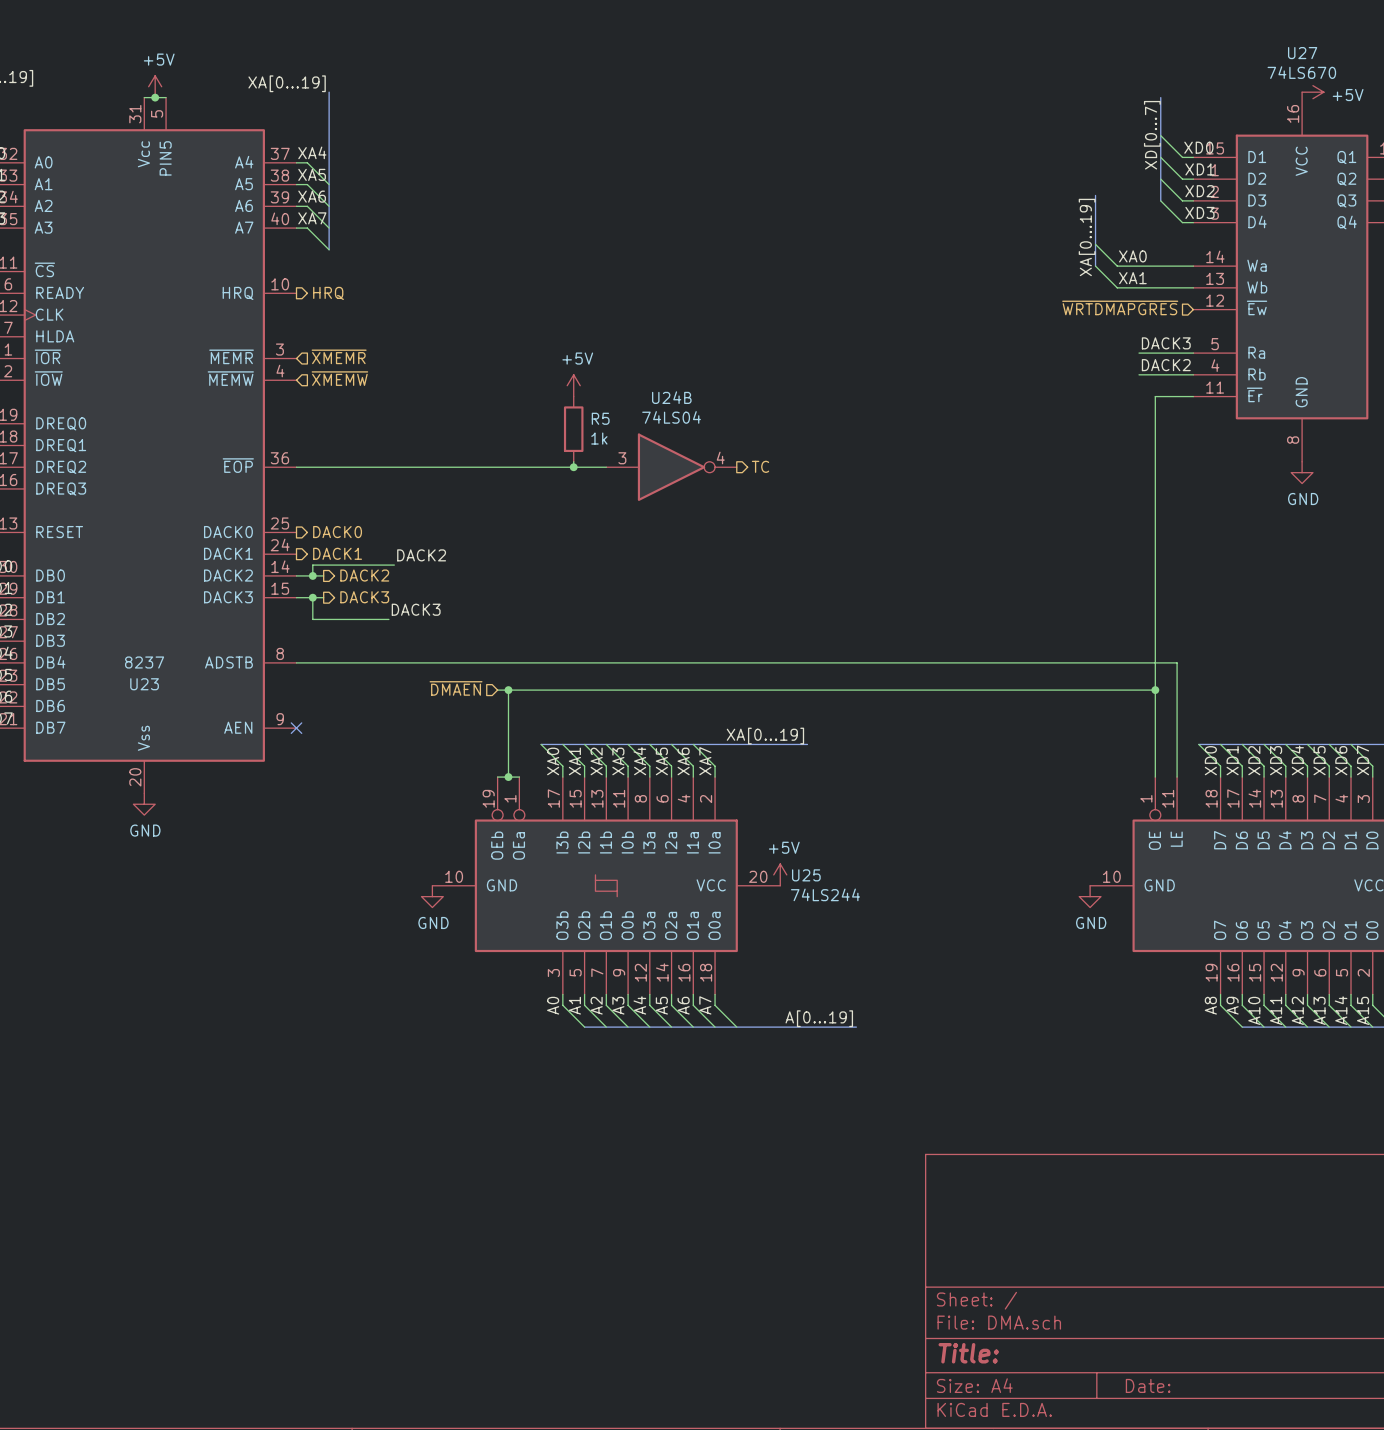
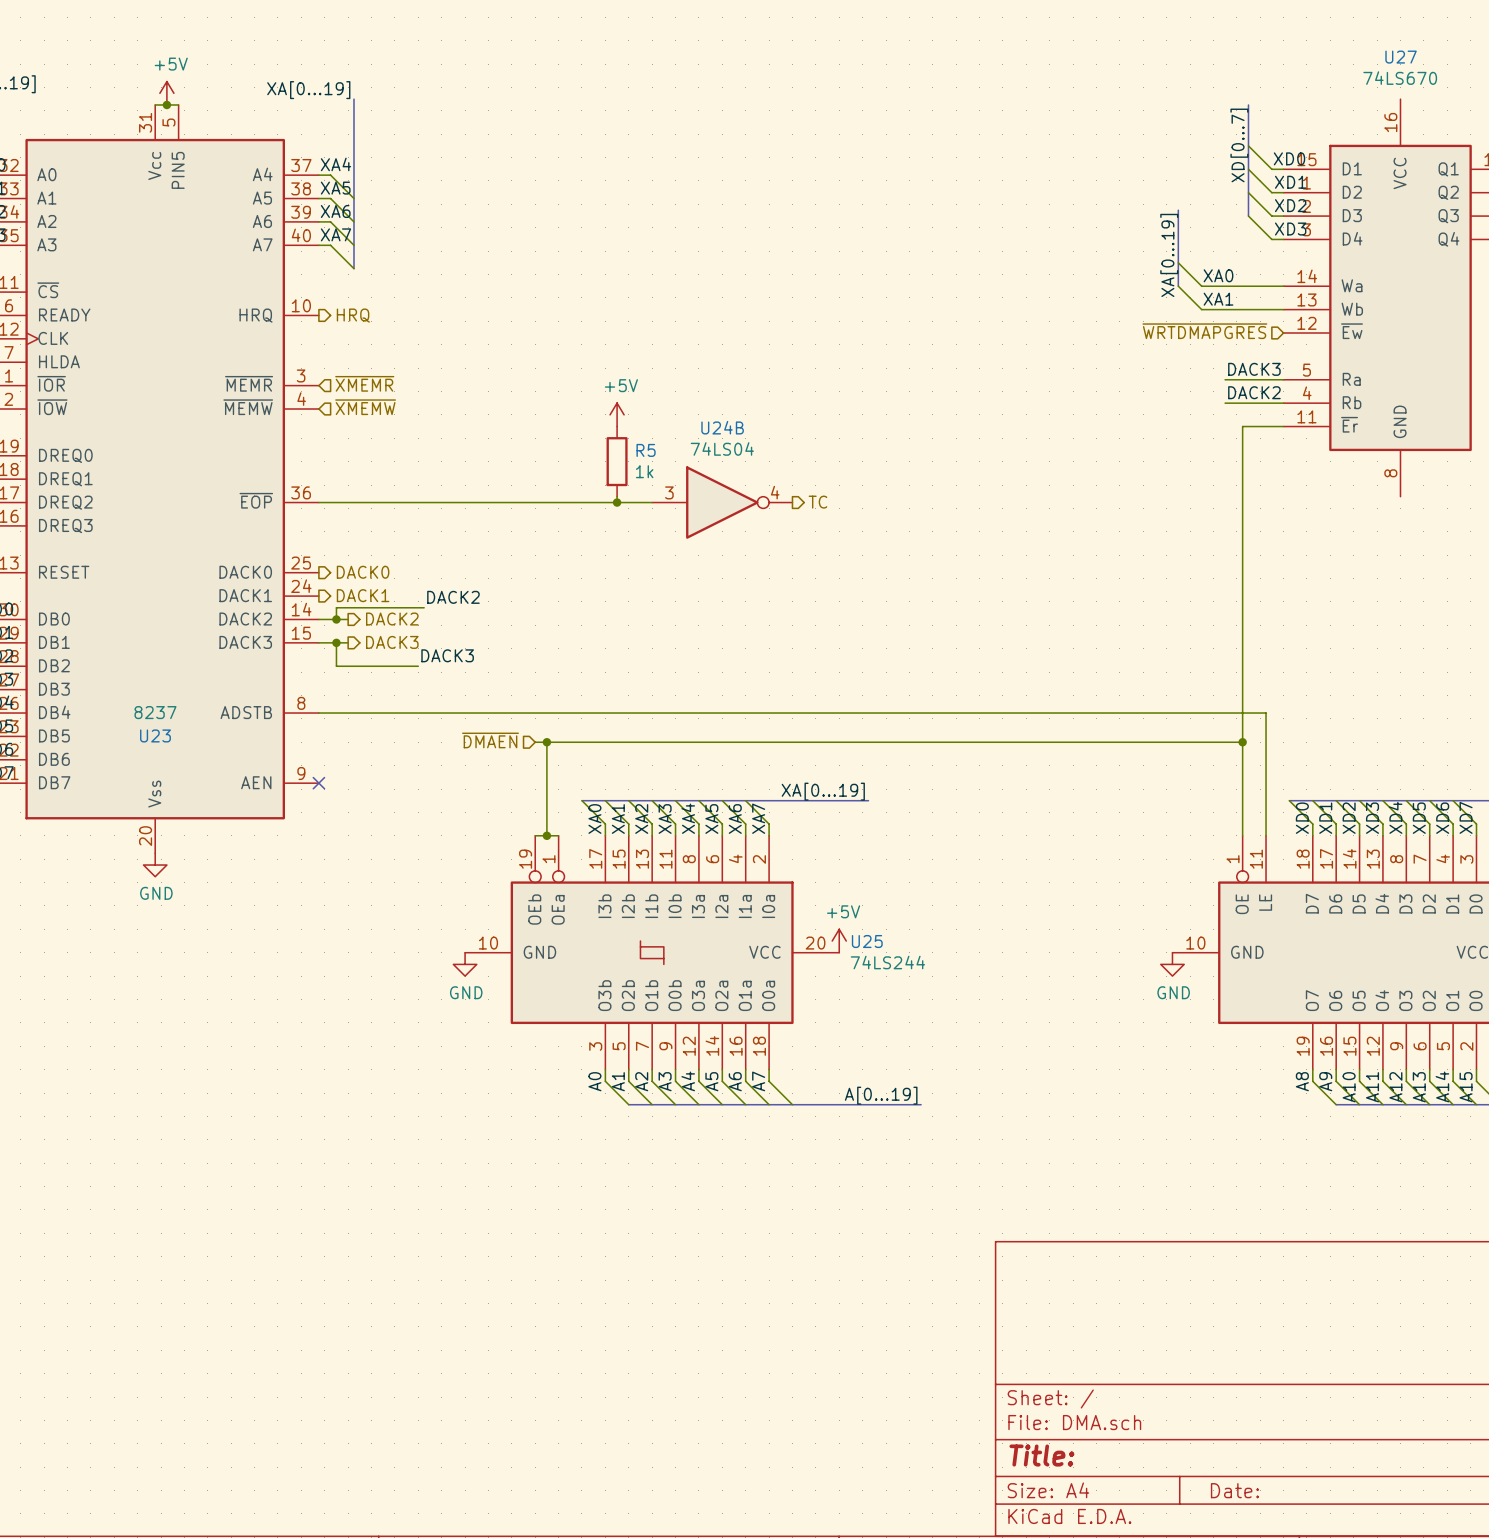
power symbol: +5V (1312, 92) -> none
power symbol: GND (1302, 472) -> none

